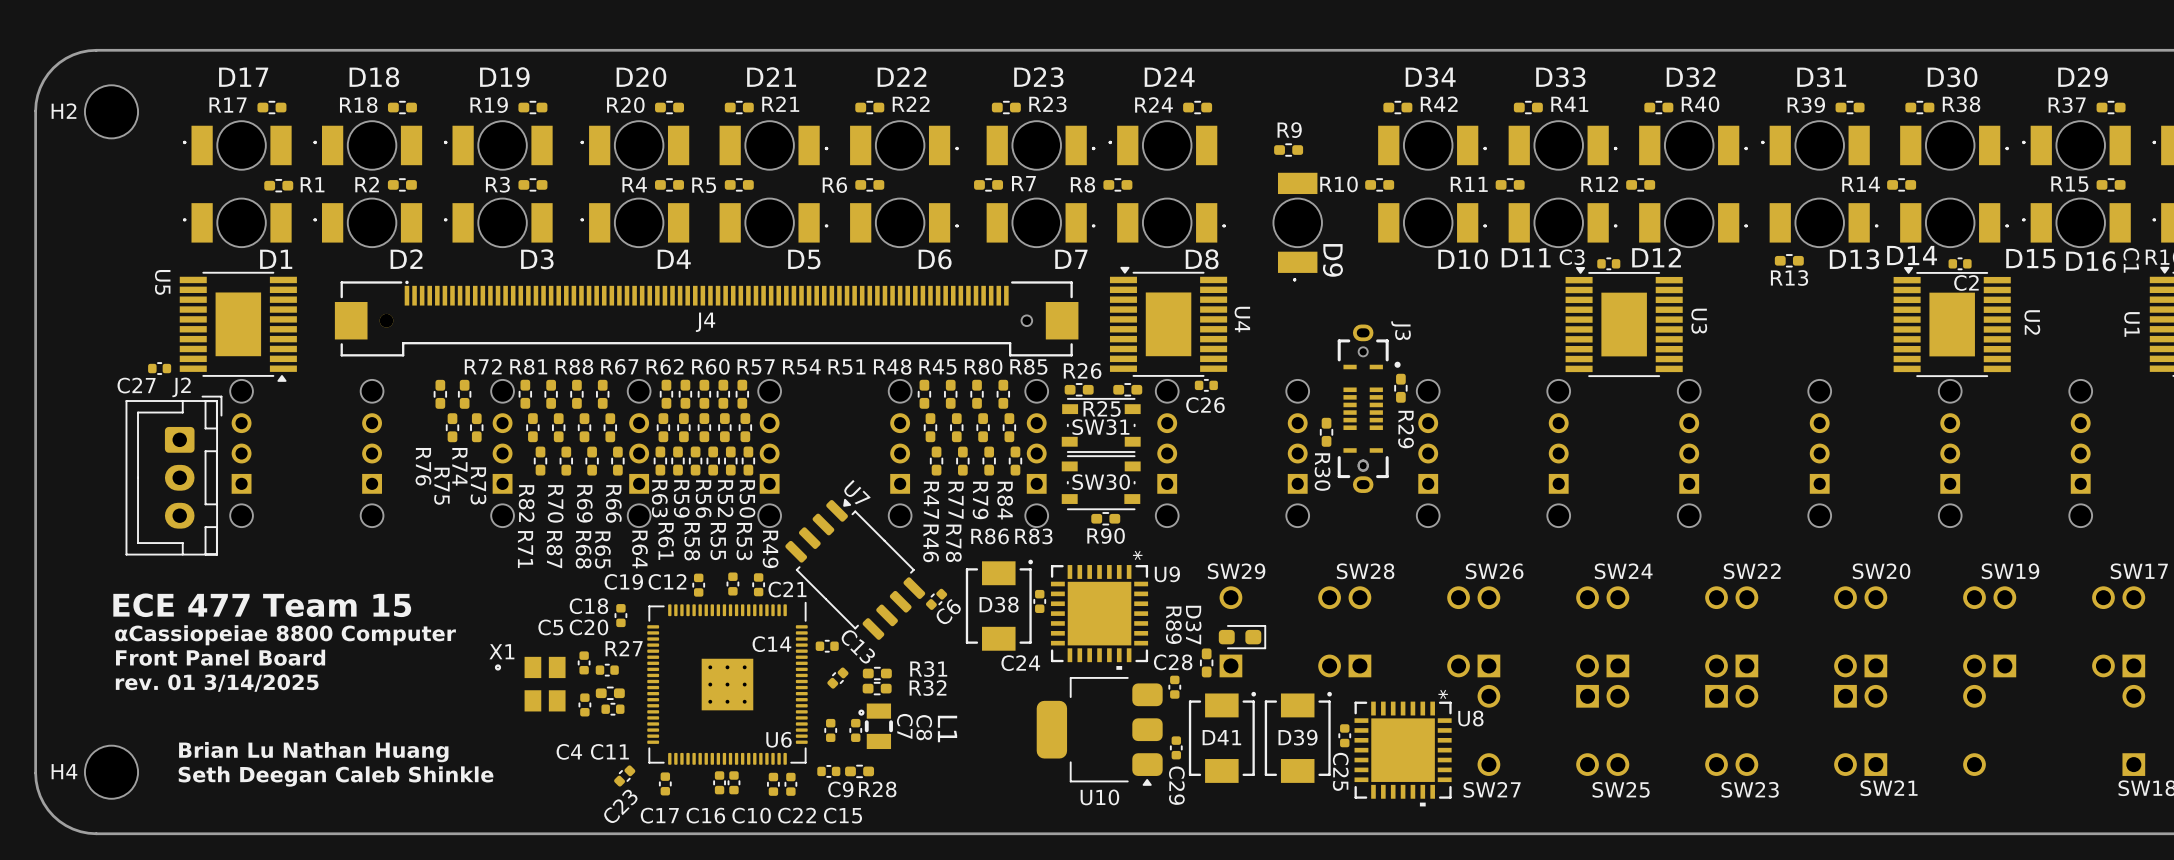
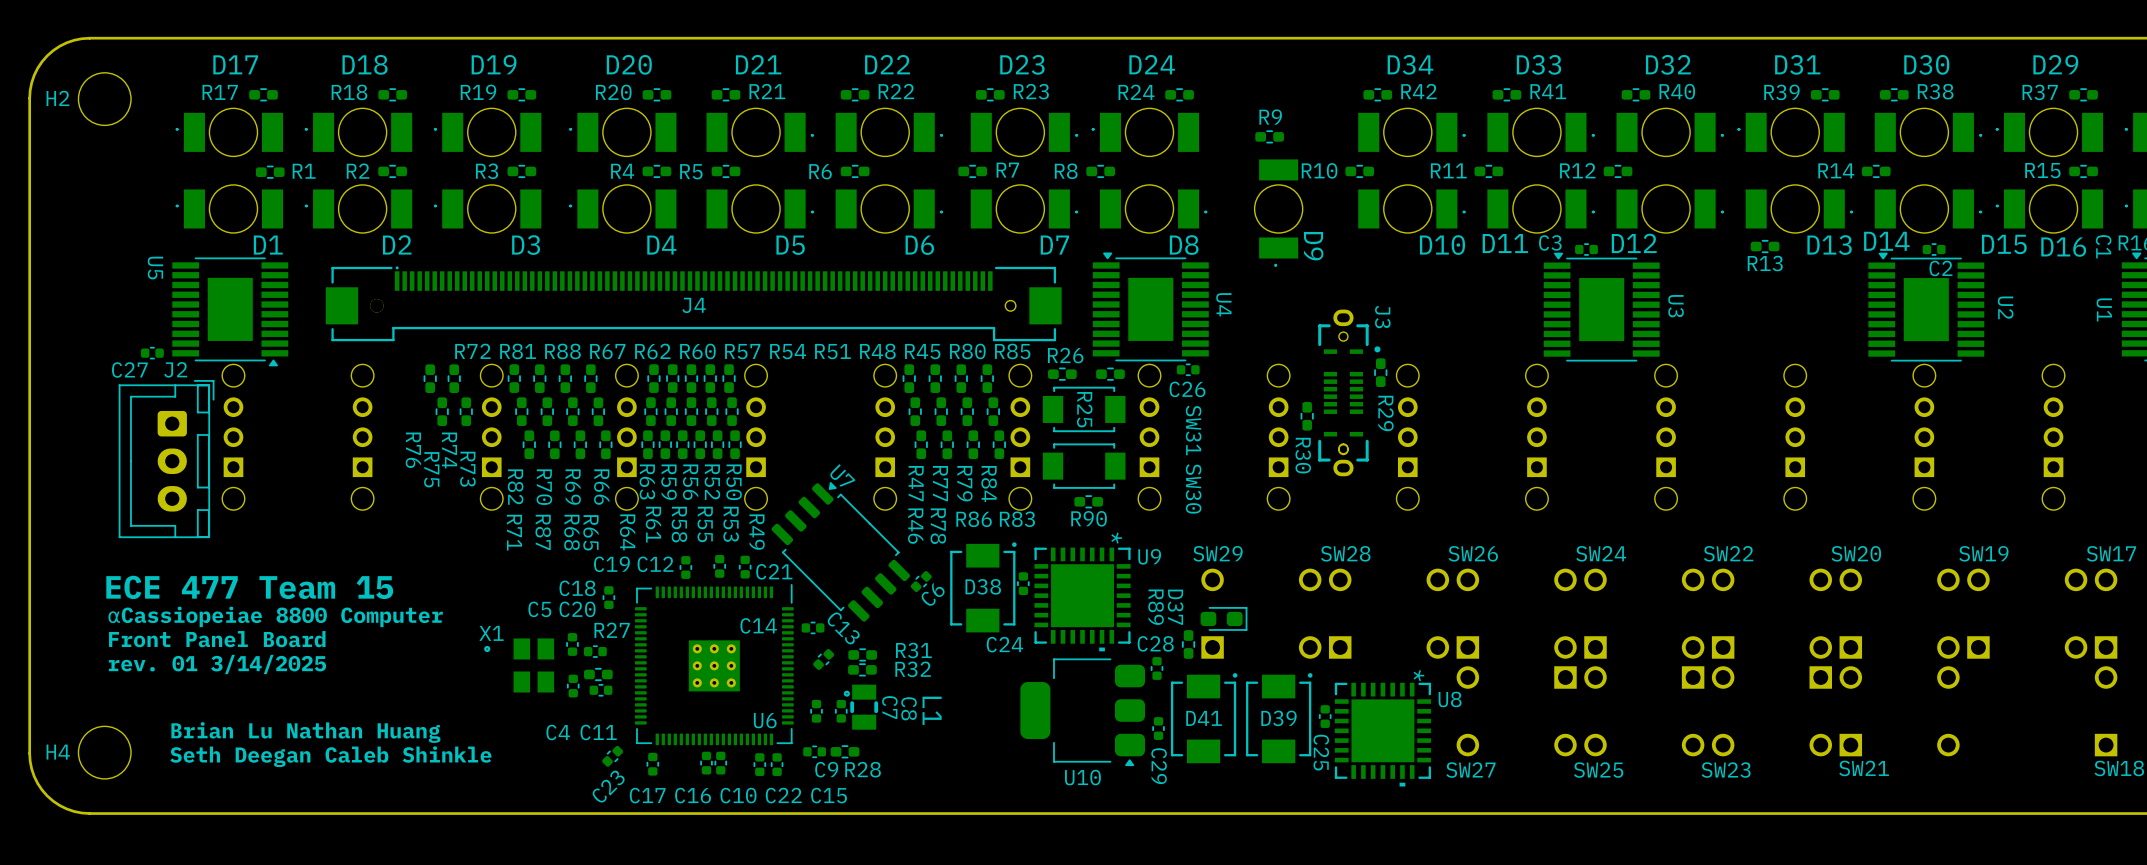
SW30 footprint: [1061, 397, 1141, 453] -> [1042, 386, 1126, 433]
R25 name rotation: 0° (1102, 408) -> 90° clockwise (1084, 409)
SW31 name position: SW31 (1100, 427) -> SW31 (1193, 430)
SW31 footprint: [1061, 455, 1141, 511] -> [1042, 443, 1126, 489]
SW30 name position: SW30 (1101, 482) -> SW30 (1193, 488)

